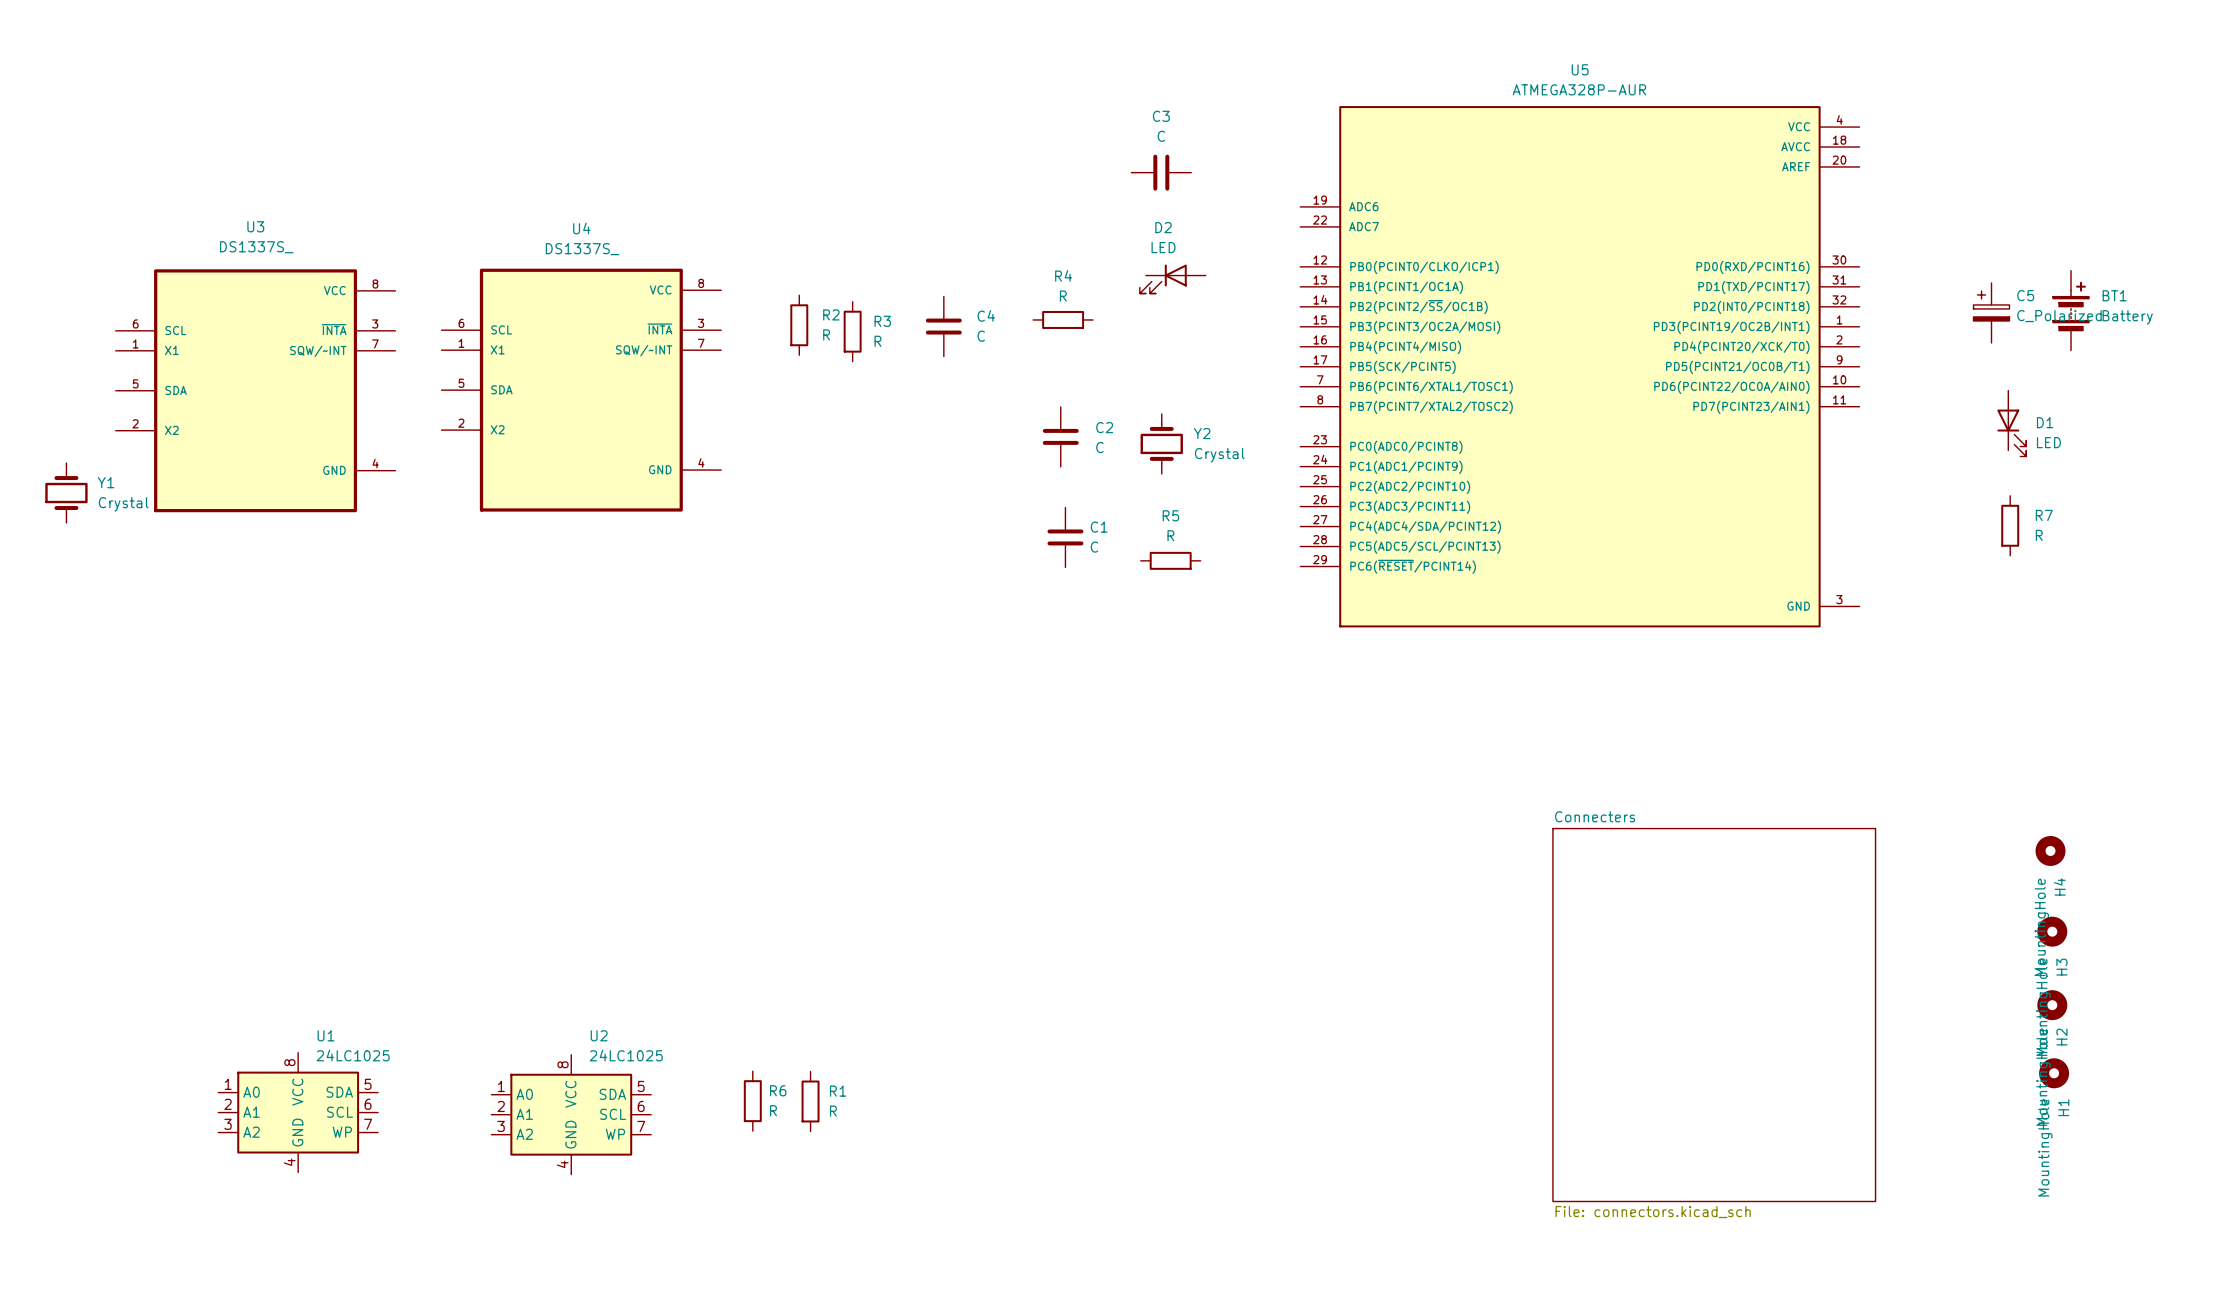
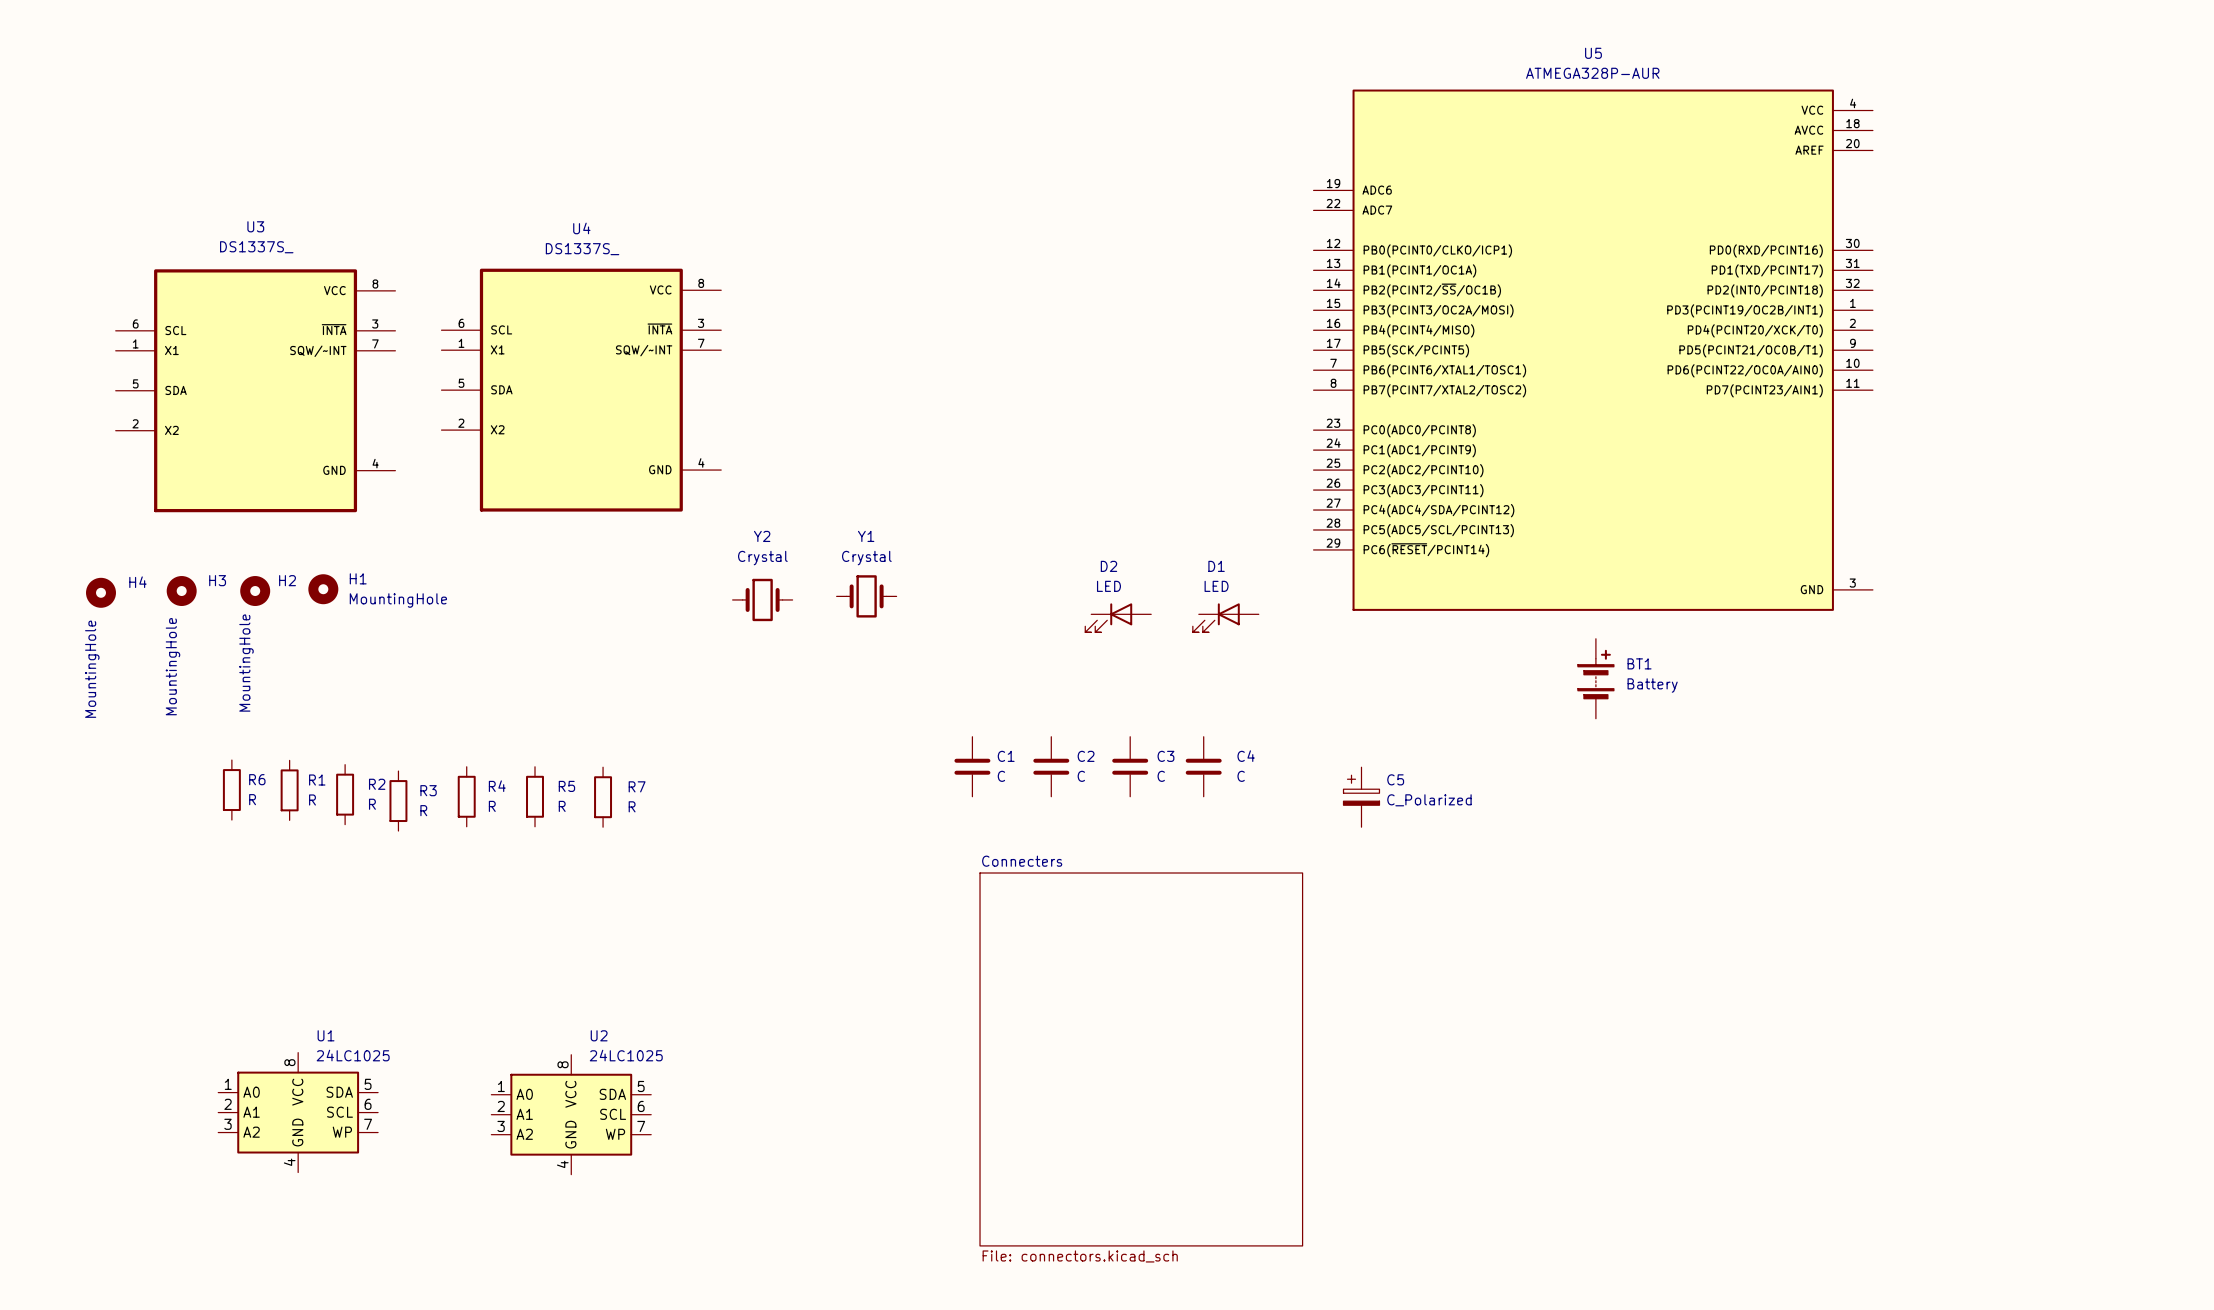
C3 name position: C3 (1161, 116) -> C3 (1165, 756)
C3 rotation: 0° (1161, 172) -> 90° clockwise (1130, 766)
C3 position: (1161, 172) -> (1130, 766)
D2 position: (1172, 279) -> (1118, 617)
BT1 position: (2071, 310) -> (1595, 678)
C5 position: (1991, 312) -> (1361, 797)
R4 rotation: 0° (1063, 319) -> 90° clockwise (466, 796)
R4 position: (1063, 319) -> (466, 796)
R2 position: (799, 325) -> (345, 794)
C4 position: (943, 326) -> (1203, 766)
R3 position: (852, 331) -> (398, 801)
U5 position: (1579, 366) -> (1593, 350)
D1 name position: D1 (2045, 422) -> D1 (1216, 566)
D1 position: (2011, 423) -> (1225, 617)
C2 name position: C2 (1104, 427) -> C2 (1086, 756)
Y2 name position: Y2 (1202, 433) -> Y2 (762, 536)
D1 rotation: 0° (2011, 433) -> 90° clockwise (1216, 617)
C2 position: (1060, 436) -> (1051, 766)
D1 value position: LED (2048, 442) -> LED (1216, 586)
Y2 rotation: 0° (1161, 443) -> 90° clockwise (762, 599)
Y2 position: (1161, 443) -> (762, 599)
C2 value position: C (1099, 447) -> C (1081, 776)
Y2 value position: Crystal (1219, 455) -> Crystal (762, 558)
Y1 name position: Y1 (106, 482) -> Y1 (866, 536)
Y1 rotation: 0° (66, 493) -> 90° clockwise (866, 596)
Y1 position: (66, 493) -> (866, 596)
Y1 value position: Crystal (123, 504) -> Crystal (866, 558)
R7 position: (2010, 525) -> (603, 797)
C1 position: (1065, 537) -> (972, 766)
R5 rotation: 0° (1170, 560) -> 90° clockwise (535, 796)
R5 position: (1170, 560) -> (535, 796)
H4 position: (2050, 850) -> (101, 592)
H4 name rotation: 0° (2059, 886) -> 90° clockwise (137, 582)
H4 name position: H4 (2059, 886) -> H4 (137, 582)
H3 position: (2052, 931) -> (181, 591)
H3 name rotation: 0° (2061, 967) -> 90° clockwise (217, 580)
H3 name position: H3 (2061, 967) -> H3 (217, 580)
H2 position: (2052, 1005) -> (255, 591)
sheet Connecters: File: connectors.kicad_sch (1714, 1015) -> none
H2 name rotation: 0° (2061, 1037) -> 90° clockwise (287, 580)
H2 name position: H2 (2061, 1037) -> H2 (287, 580)
sheet Connecters: none -> File: connectors.kicad_sch (1141, 1059)
H1 position: (2054, 1073) -> (323, 589)
R6 position: (752, 1101) -> (231, 790)
R1 position: (810, 1101) -> (289, 790)
H1 name rotation: 0° (2063, 1107) -> 90° clockwise (358, 578)
H1 name position: H1 (2063, 1107) -> H1 (358, 578)
H1 value rotation: 0° (2045, 1147) -> 90° clockwise (398, 600)

